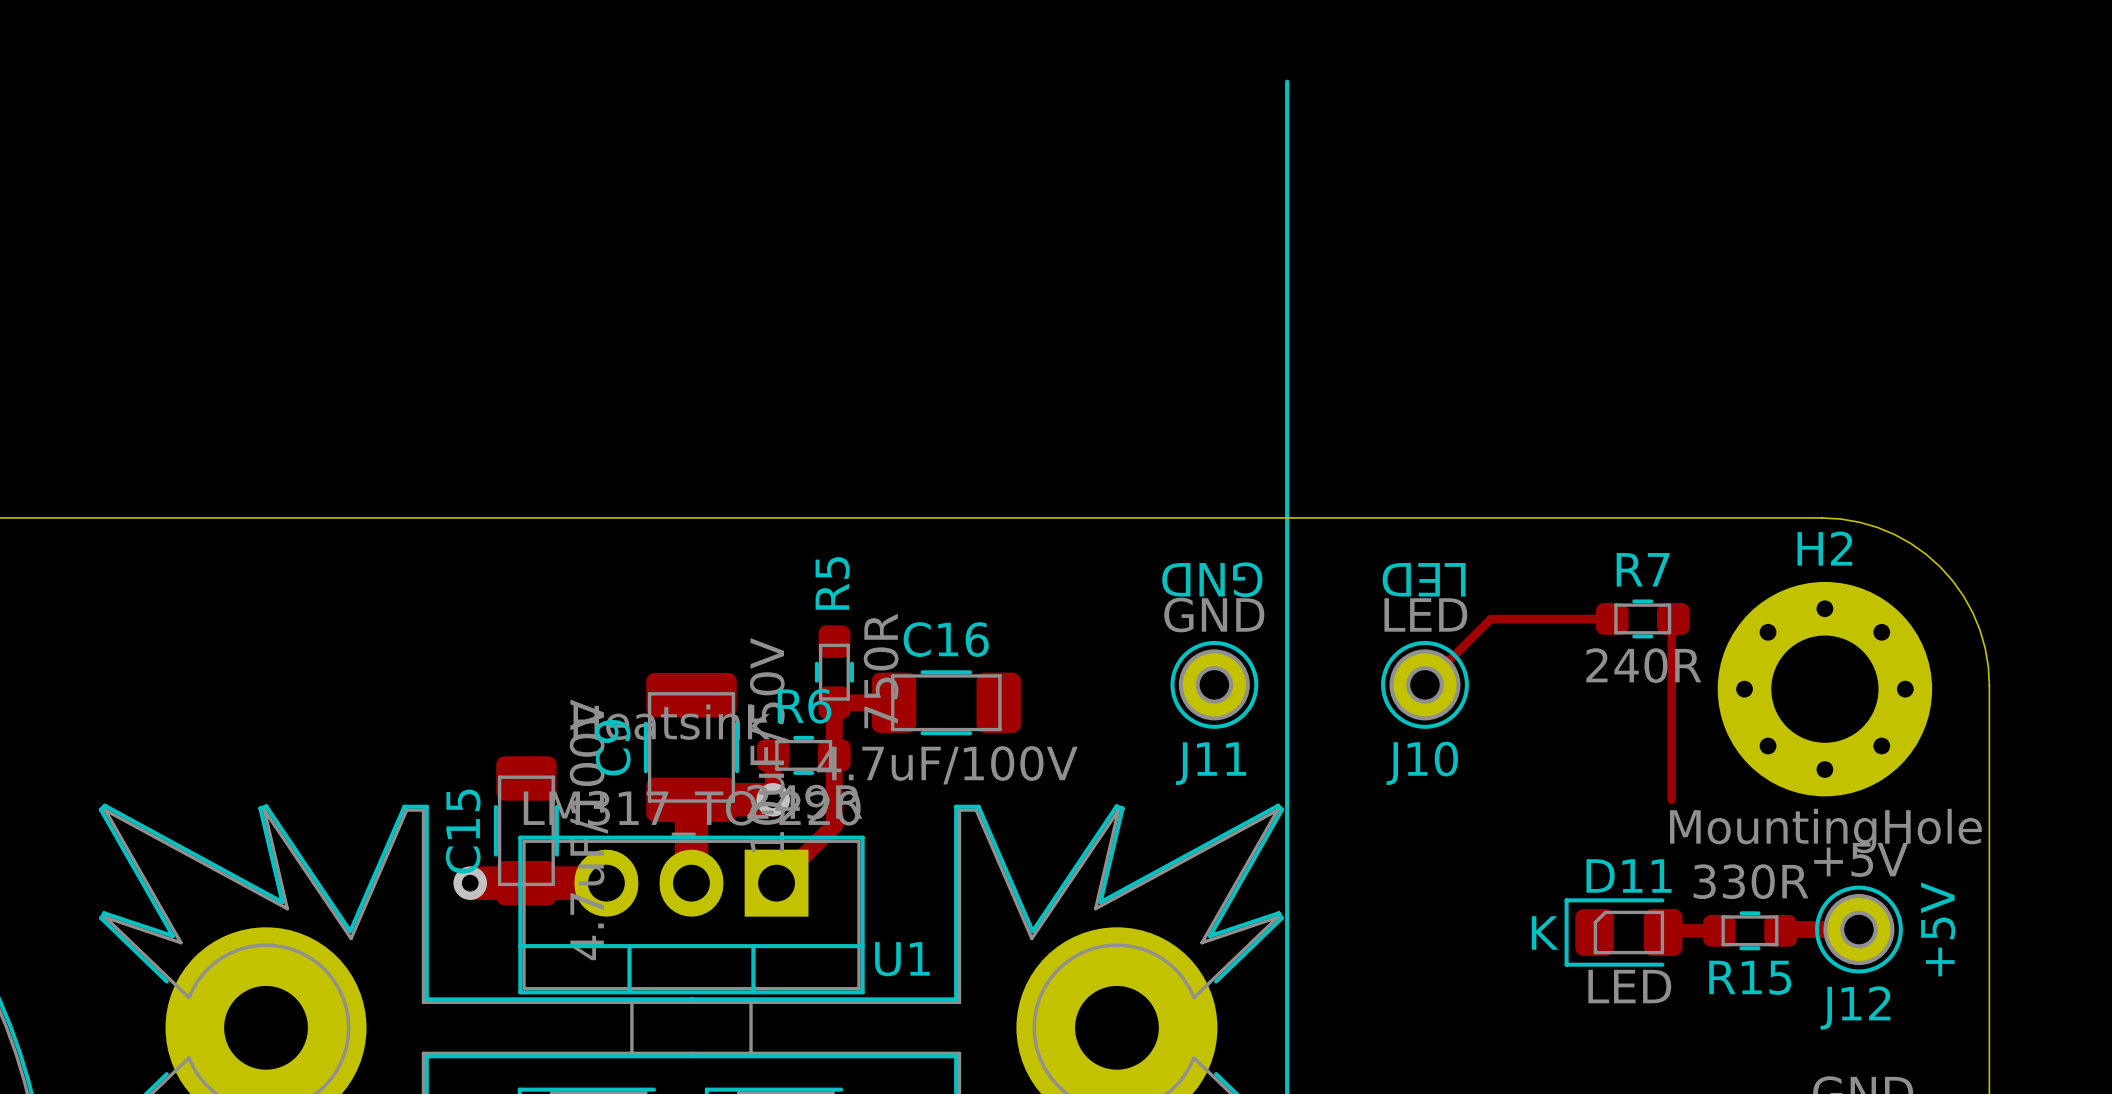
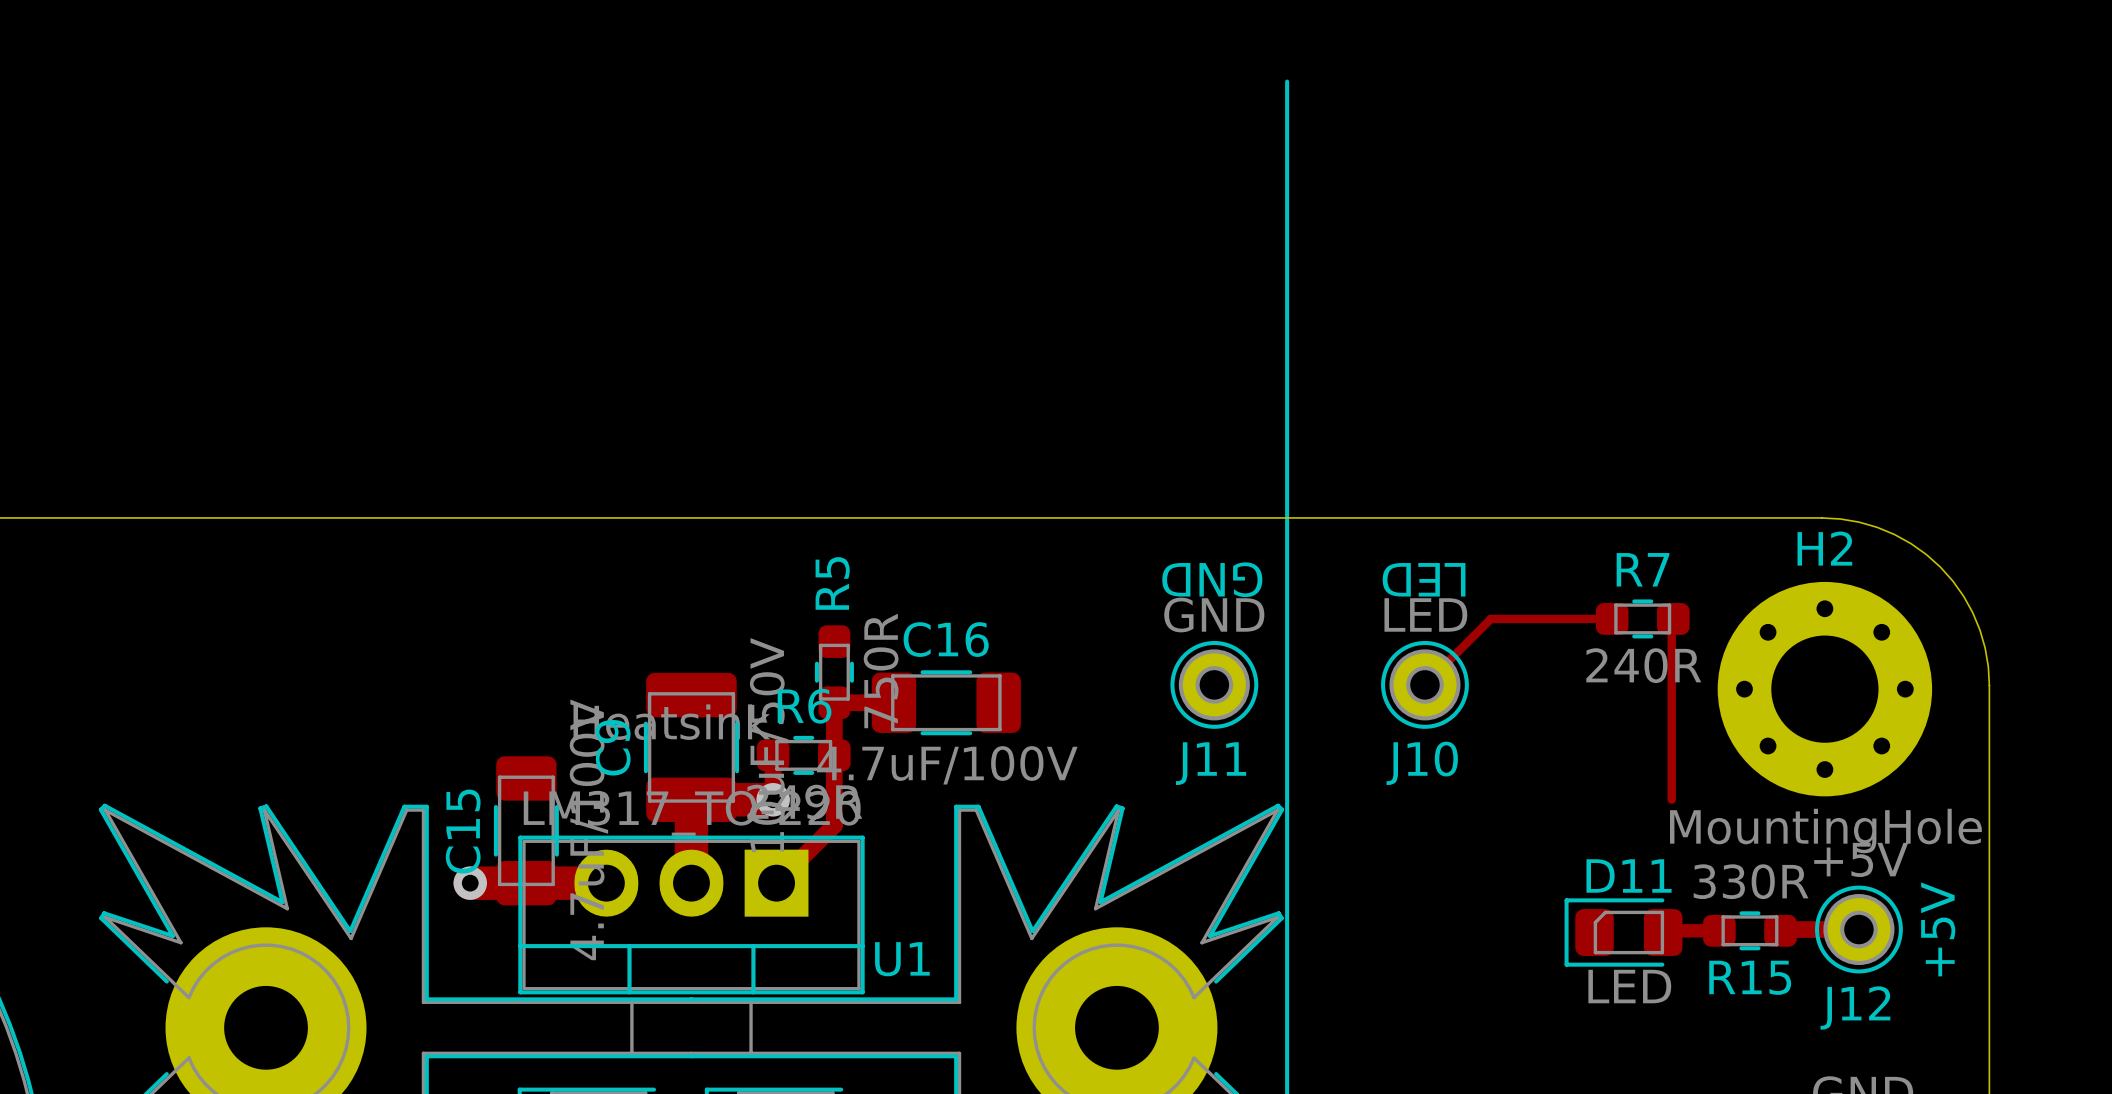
text: K (1545, 932) -> none

